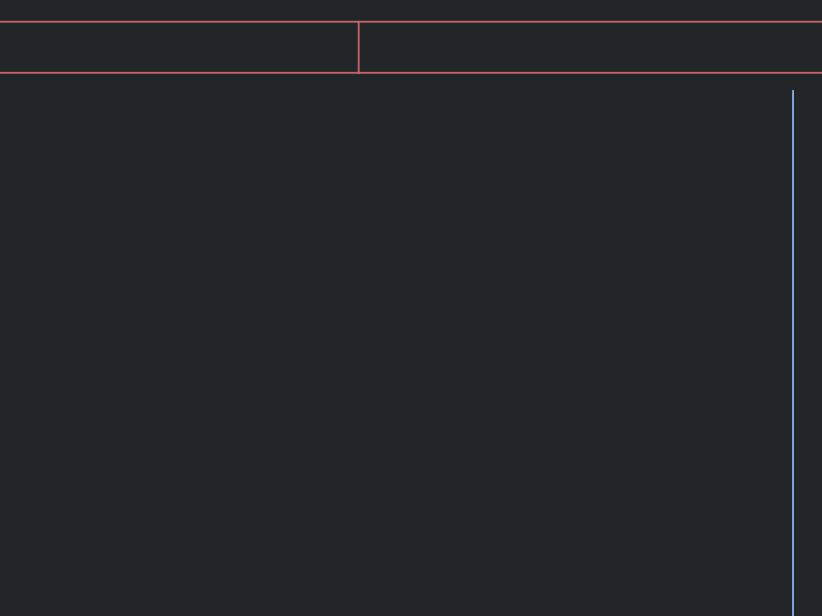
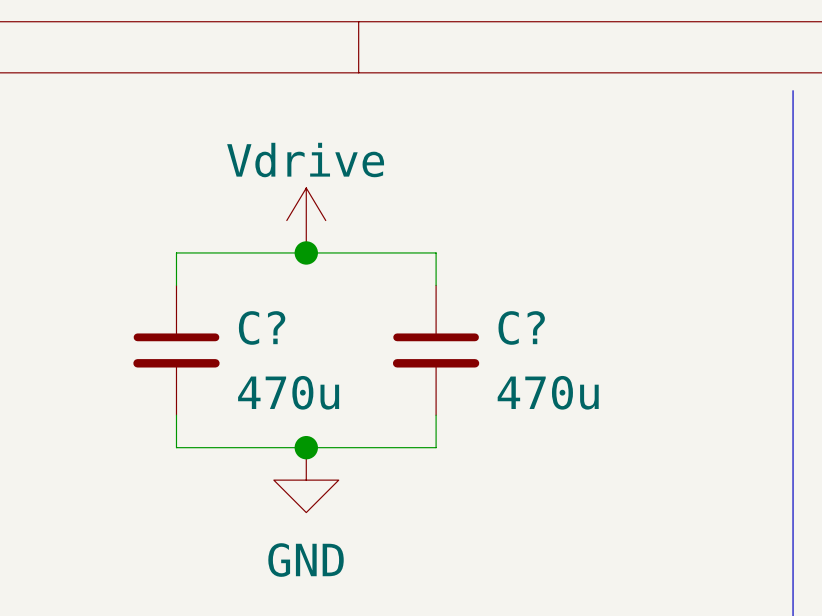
power symbol: none -> Vdrive (306, 220)
junction: none -> (306, 252)
wire: none -> (176, 285) (176, 252) (436, 252) (436, 285)
C?: none -> 470u (176, 350)
C?: none -> 470u (436, 350)
wire: none -> (176, 415) (176, 447) (436, 447) (436, 415)
junction: none -> (306, 447)
power symbol: none -> GND (306, 480)

